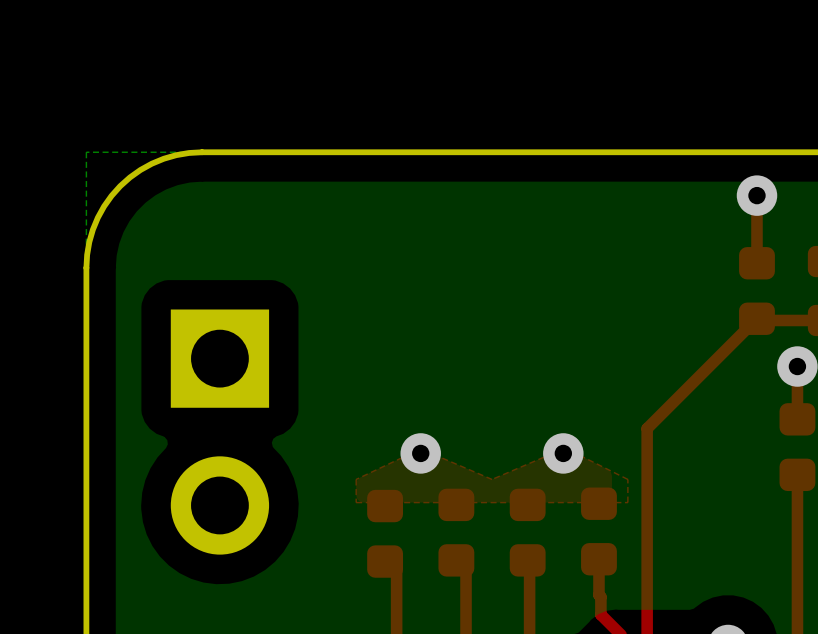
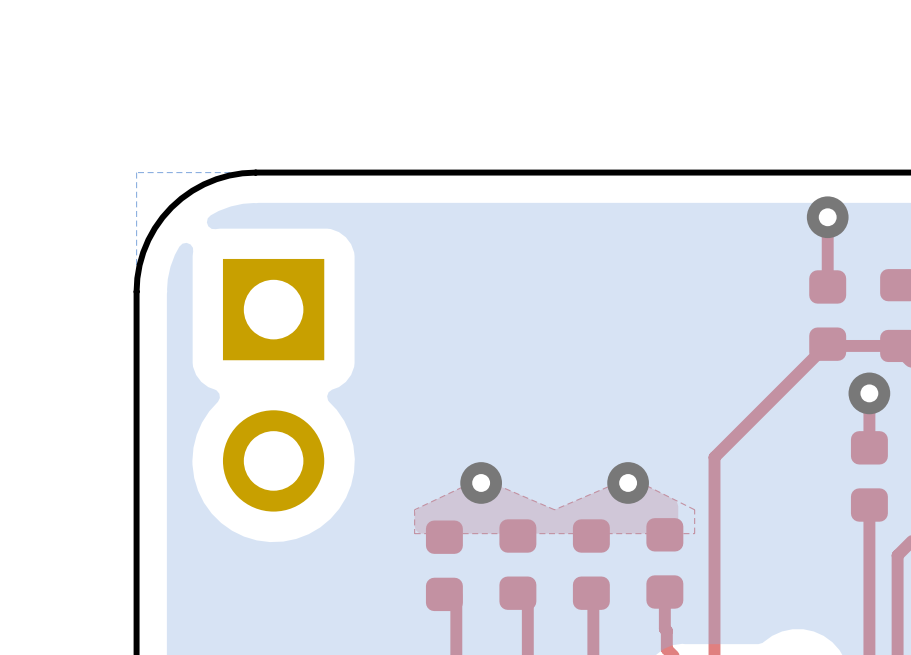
part position: (219, 432) -> (273, 385)

